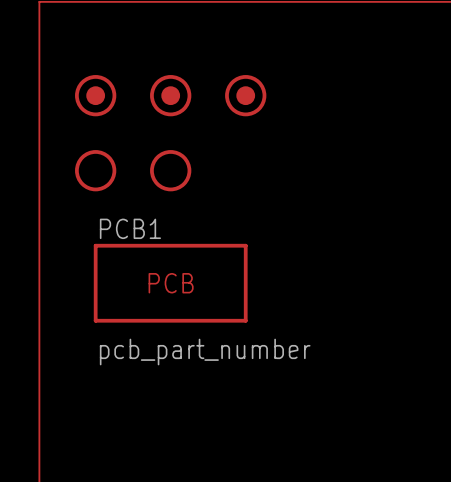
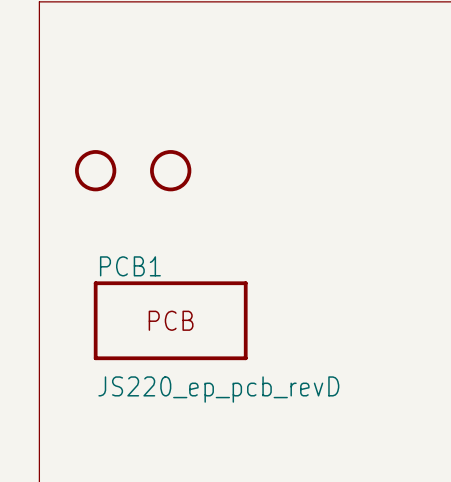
part: (95, 95) -> none
part: (170, 95) -> none
part: (245, 95) -> none
PCB1 position: (170, 283) -> (170, 320)
PCB1 value: pcb_part_number (205, 352) -> JS220_ep_pcb_revD (218, 389)

